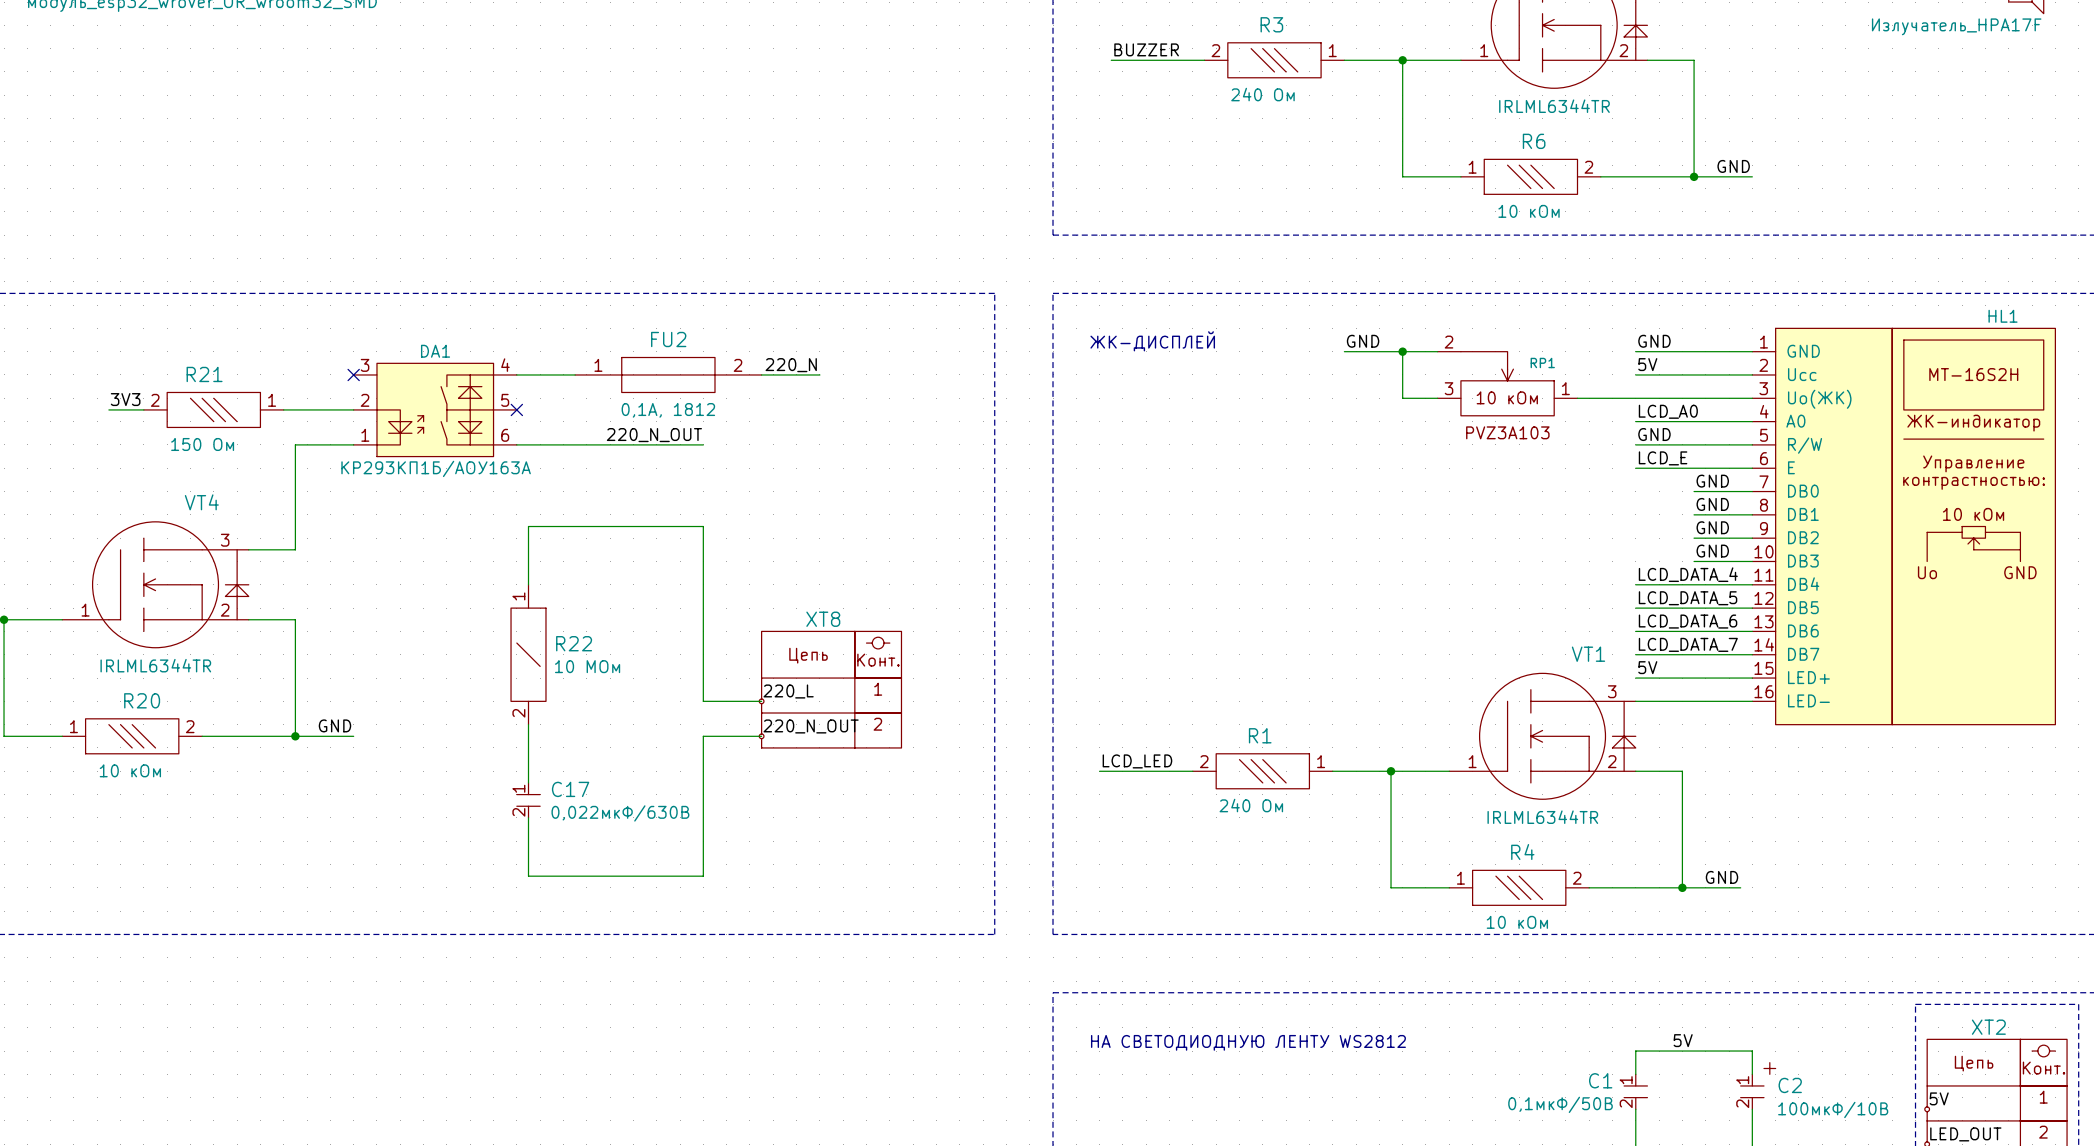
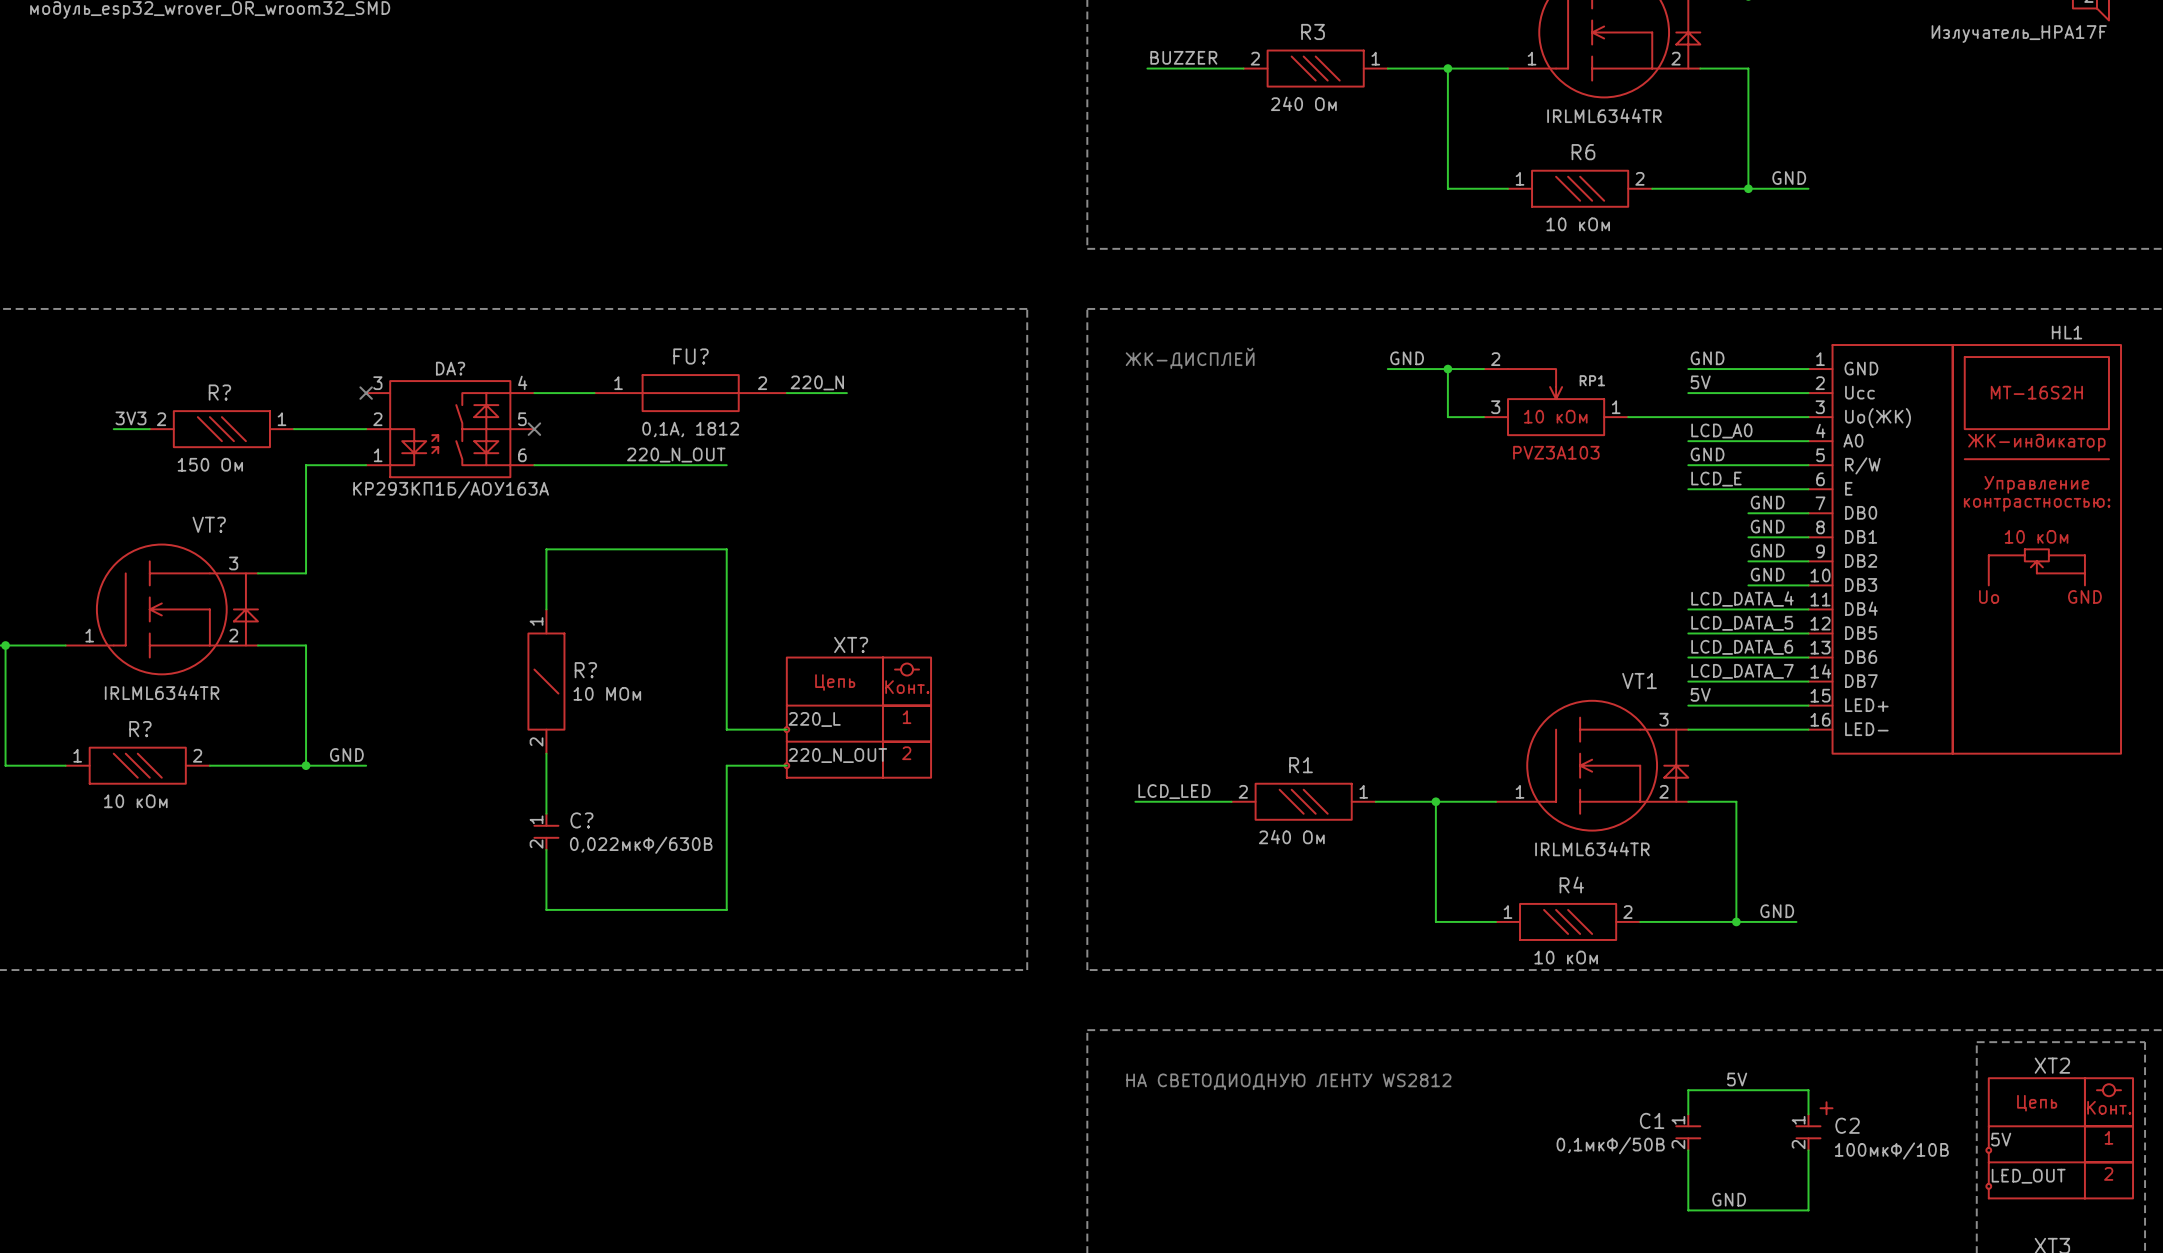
FU2 name: FU2 (668, 339) -> FU? (691, 356)
DA1 name: DA1 (435, 351) -> DA? (450, 368)
R21 name: R21 (204, 374) -> R? (219, 392)
VT4 name: VT4 (201, 502) -> VT? (209, 524)
XT8 name: XT8 (823, 619) -> XT? (851, 644)
R22 name: R22 (574, 643) -> R? (585, 670)
R20 name: R20 (142, 700) -> R? (140, 729)
C17 name: C17 (570, 789) -> C? (581, 820)

